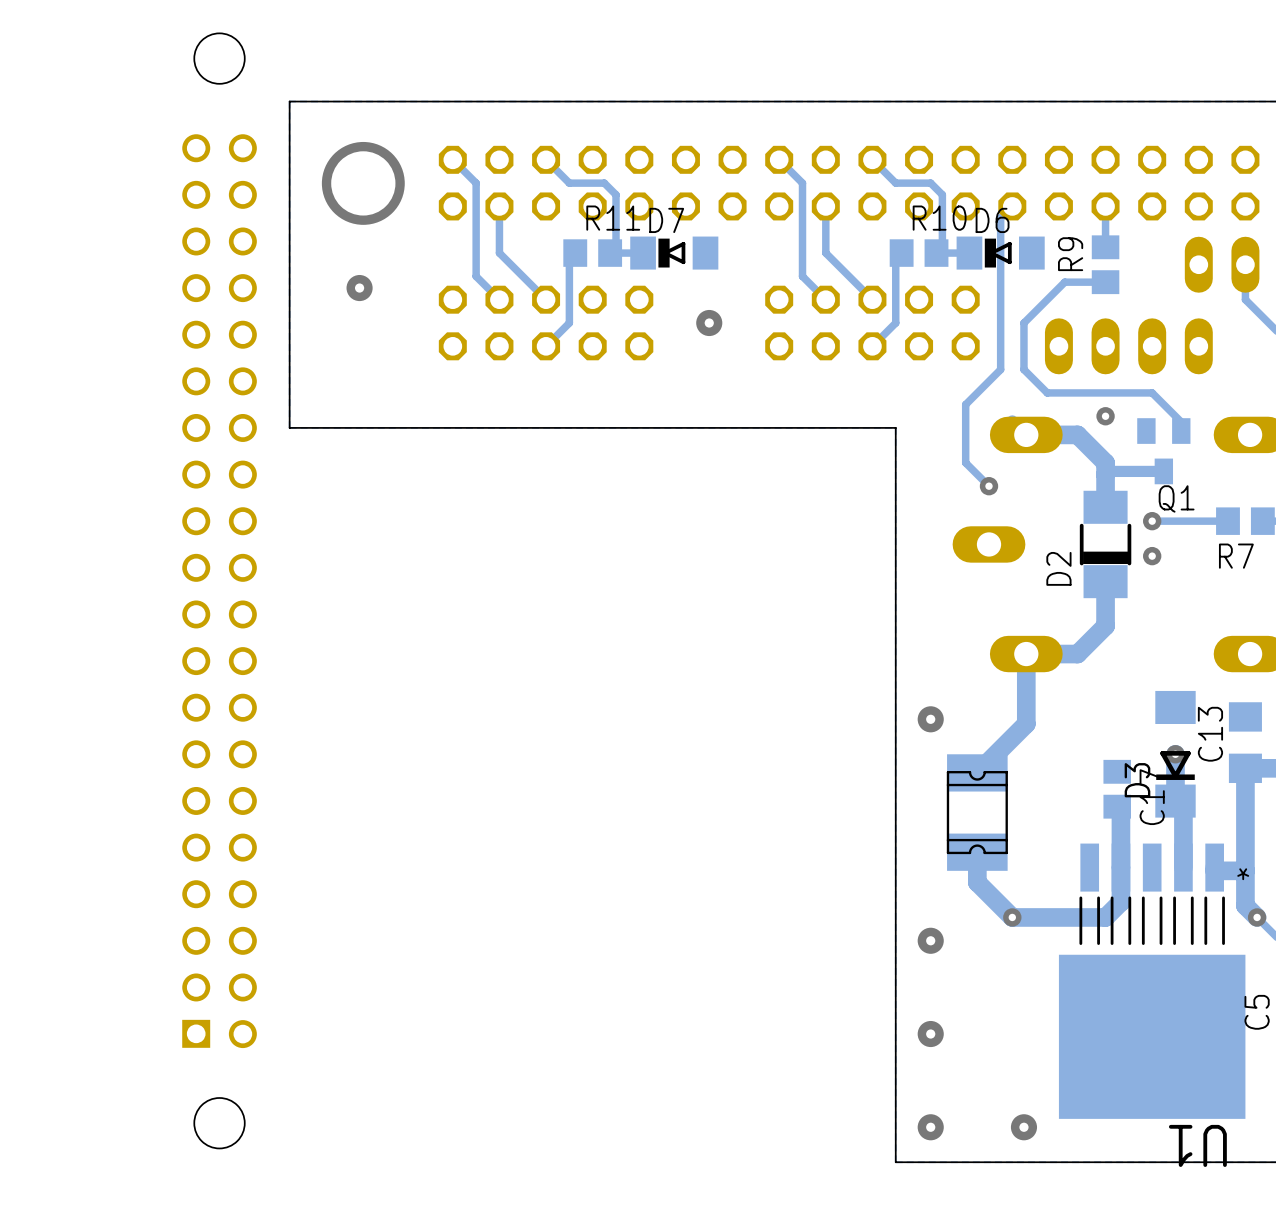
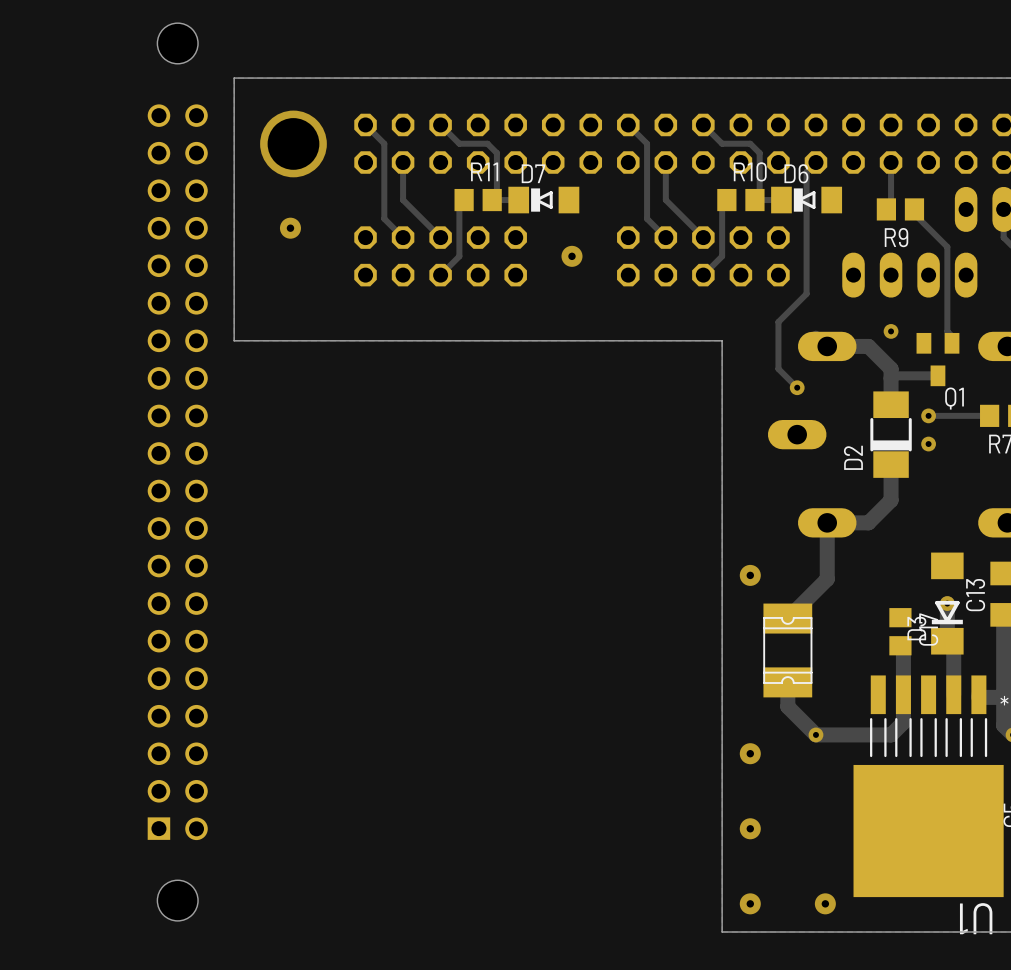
R9 name position: R9 (1070, 254) -> R9 (896, 237)
R9 rotation: 0° (1105, 264) -> 90° clockwise (900, 209)
track: (1105, 282) (1064, 282) (1023, 323) (1023, 369) (1047, 392) (1152, 392) (1175, 416) -> (914, 209) (909, 209) (947, 246) (947, 331)

